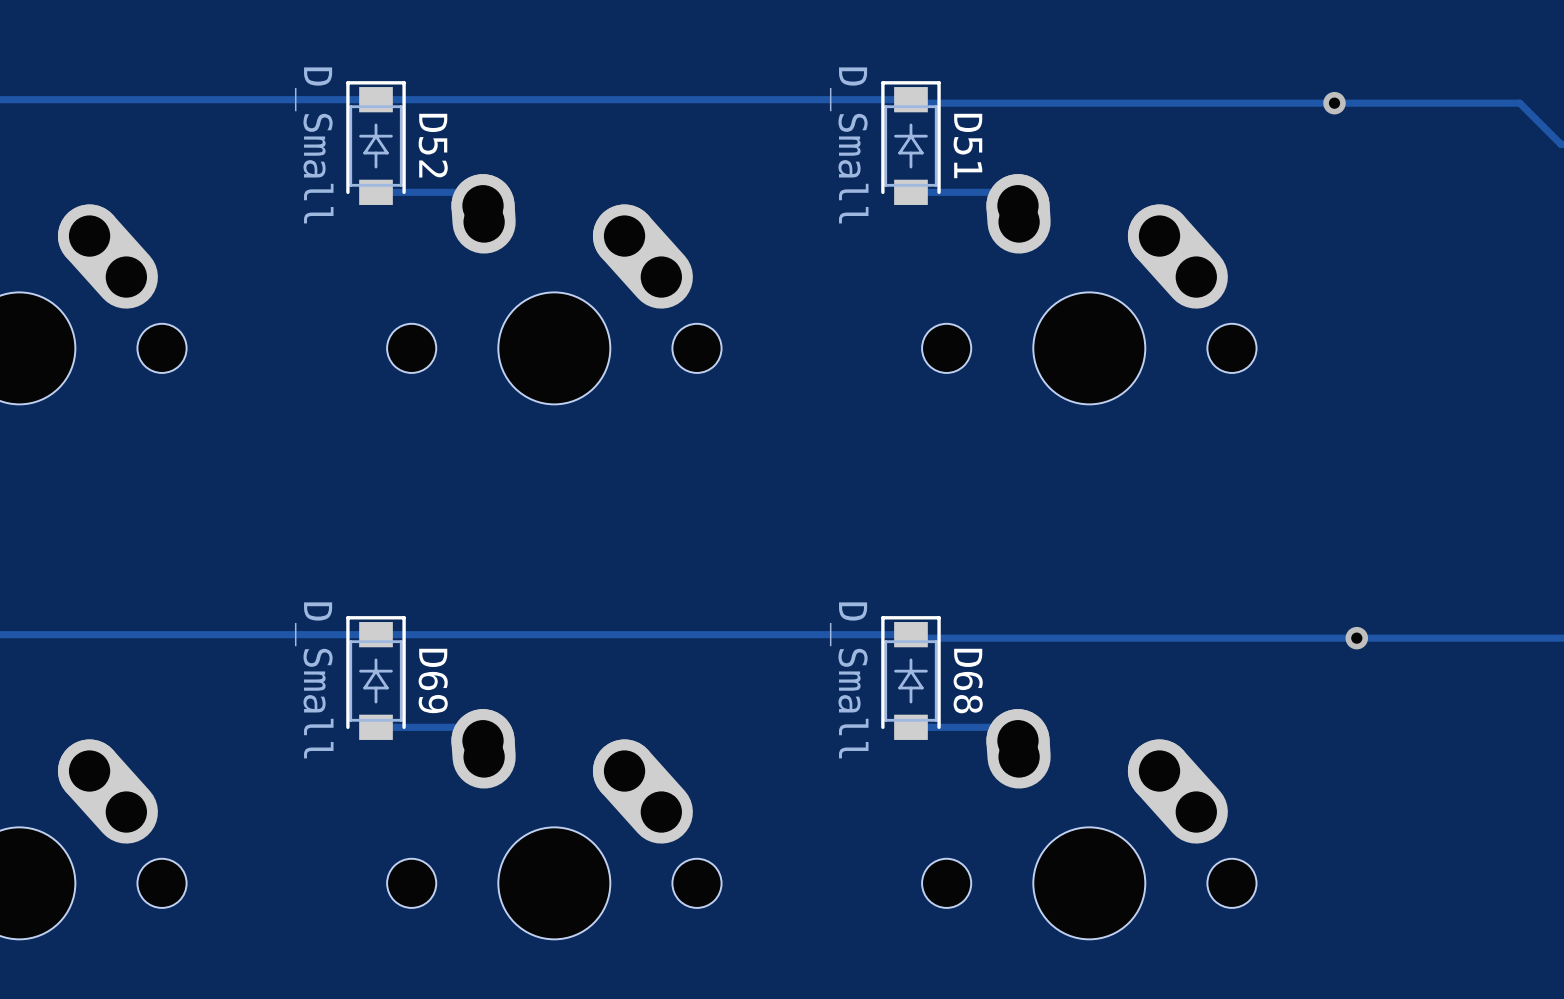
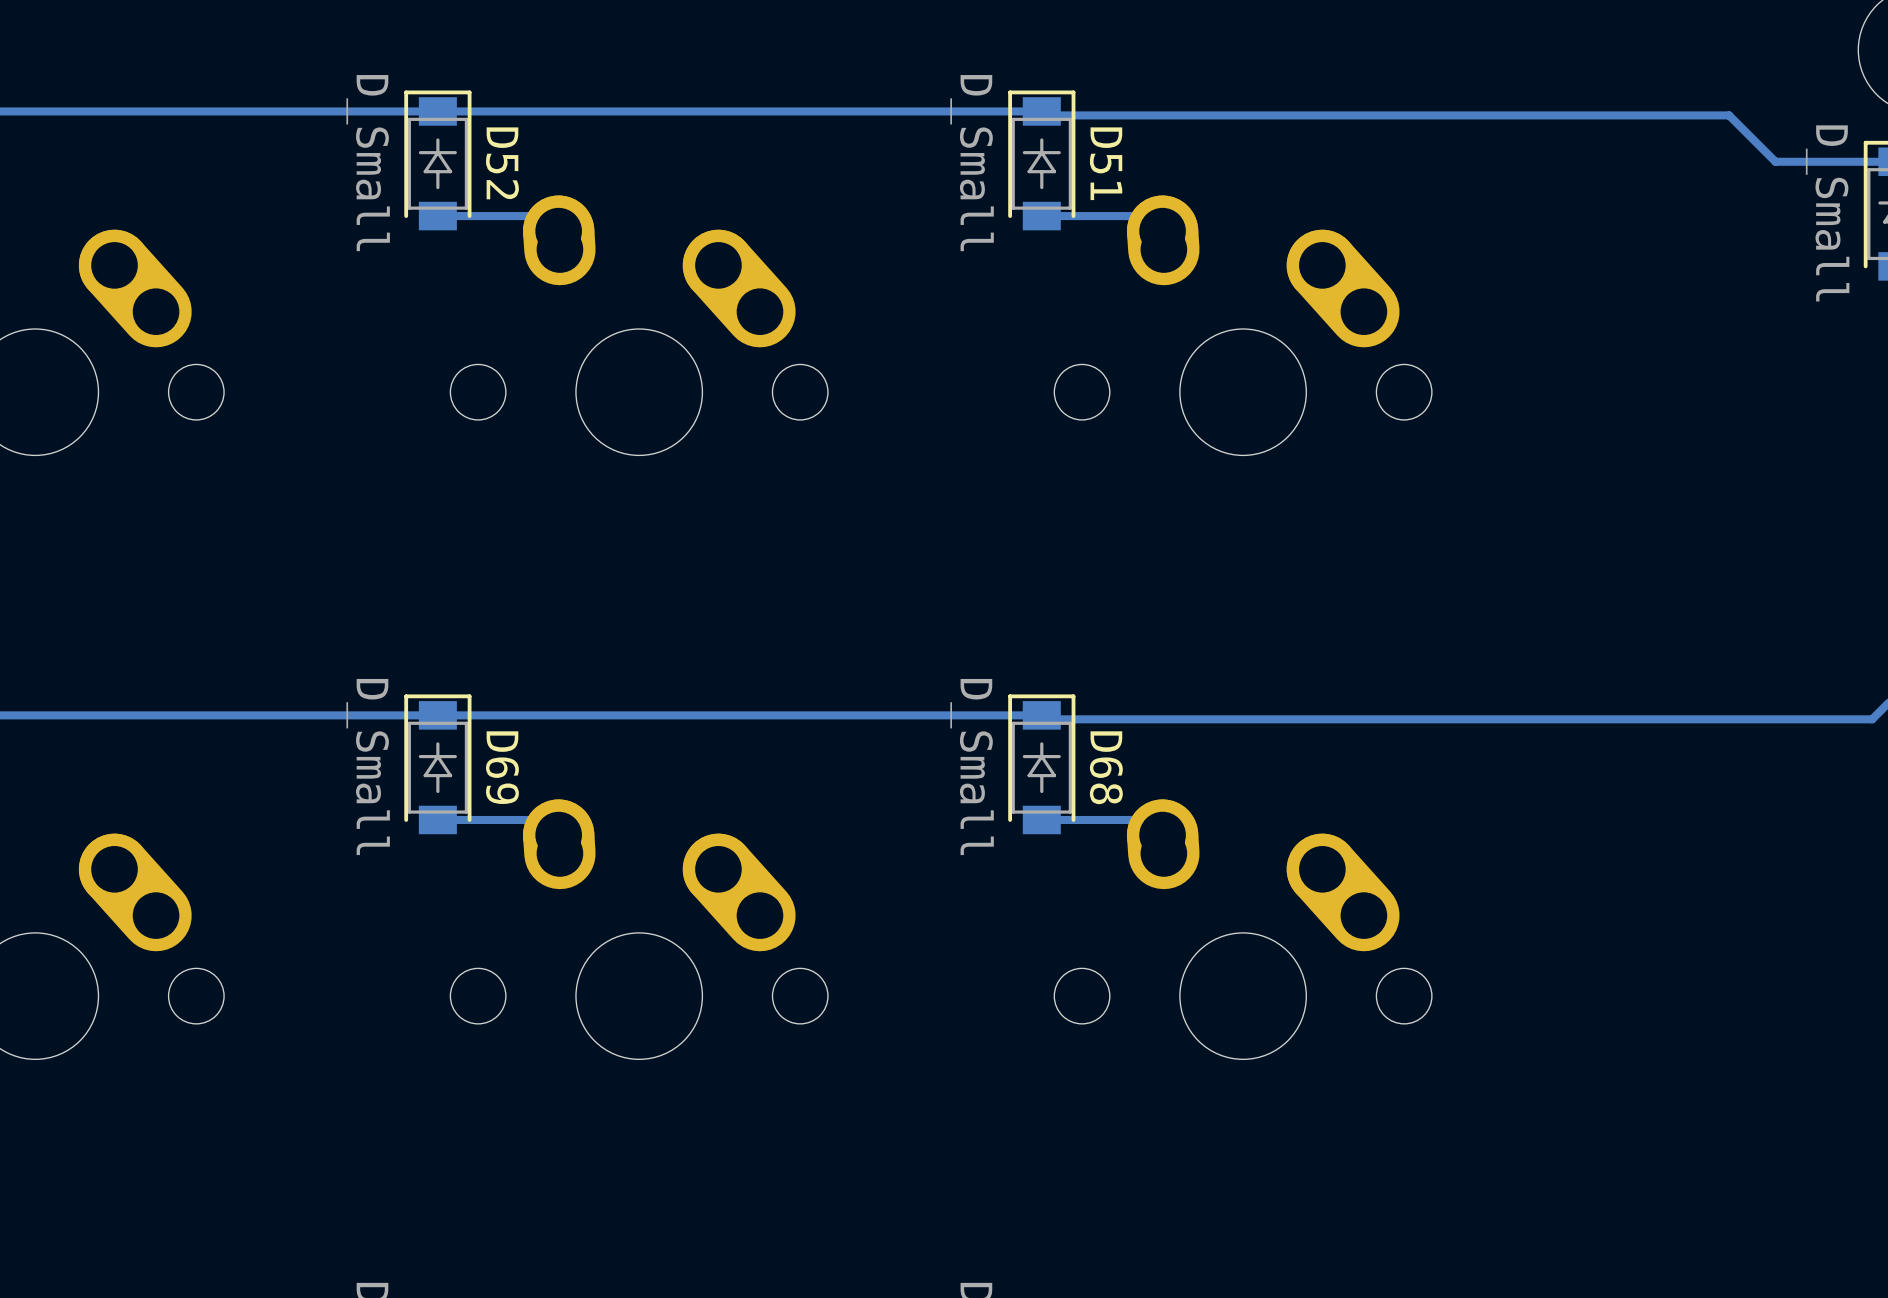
via: (1334, 103) -> none
via: (1356, 638) -> none

